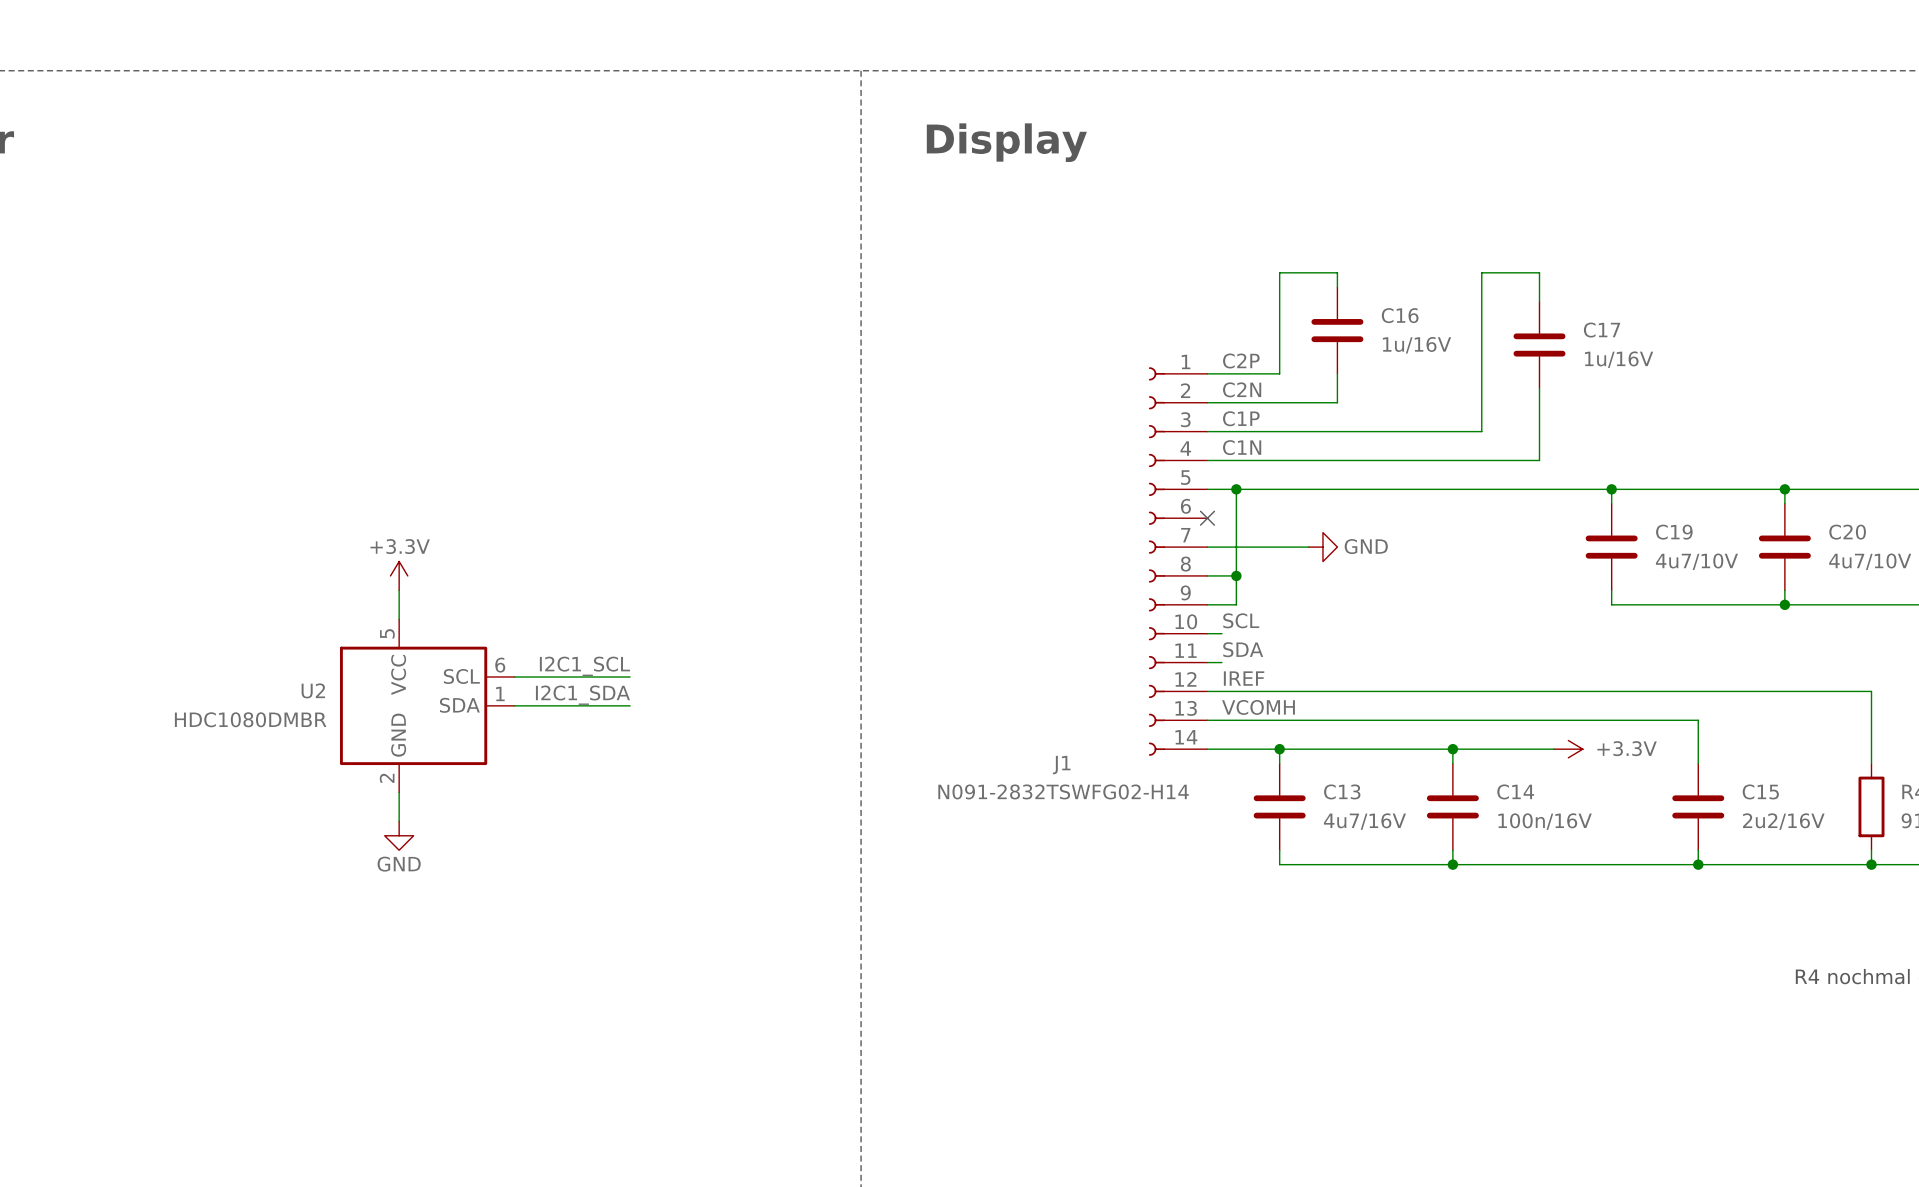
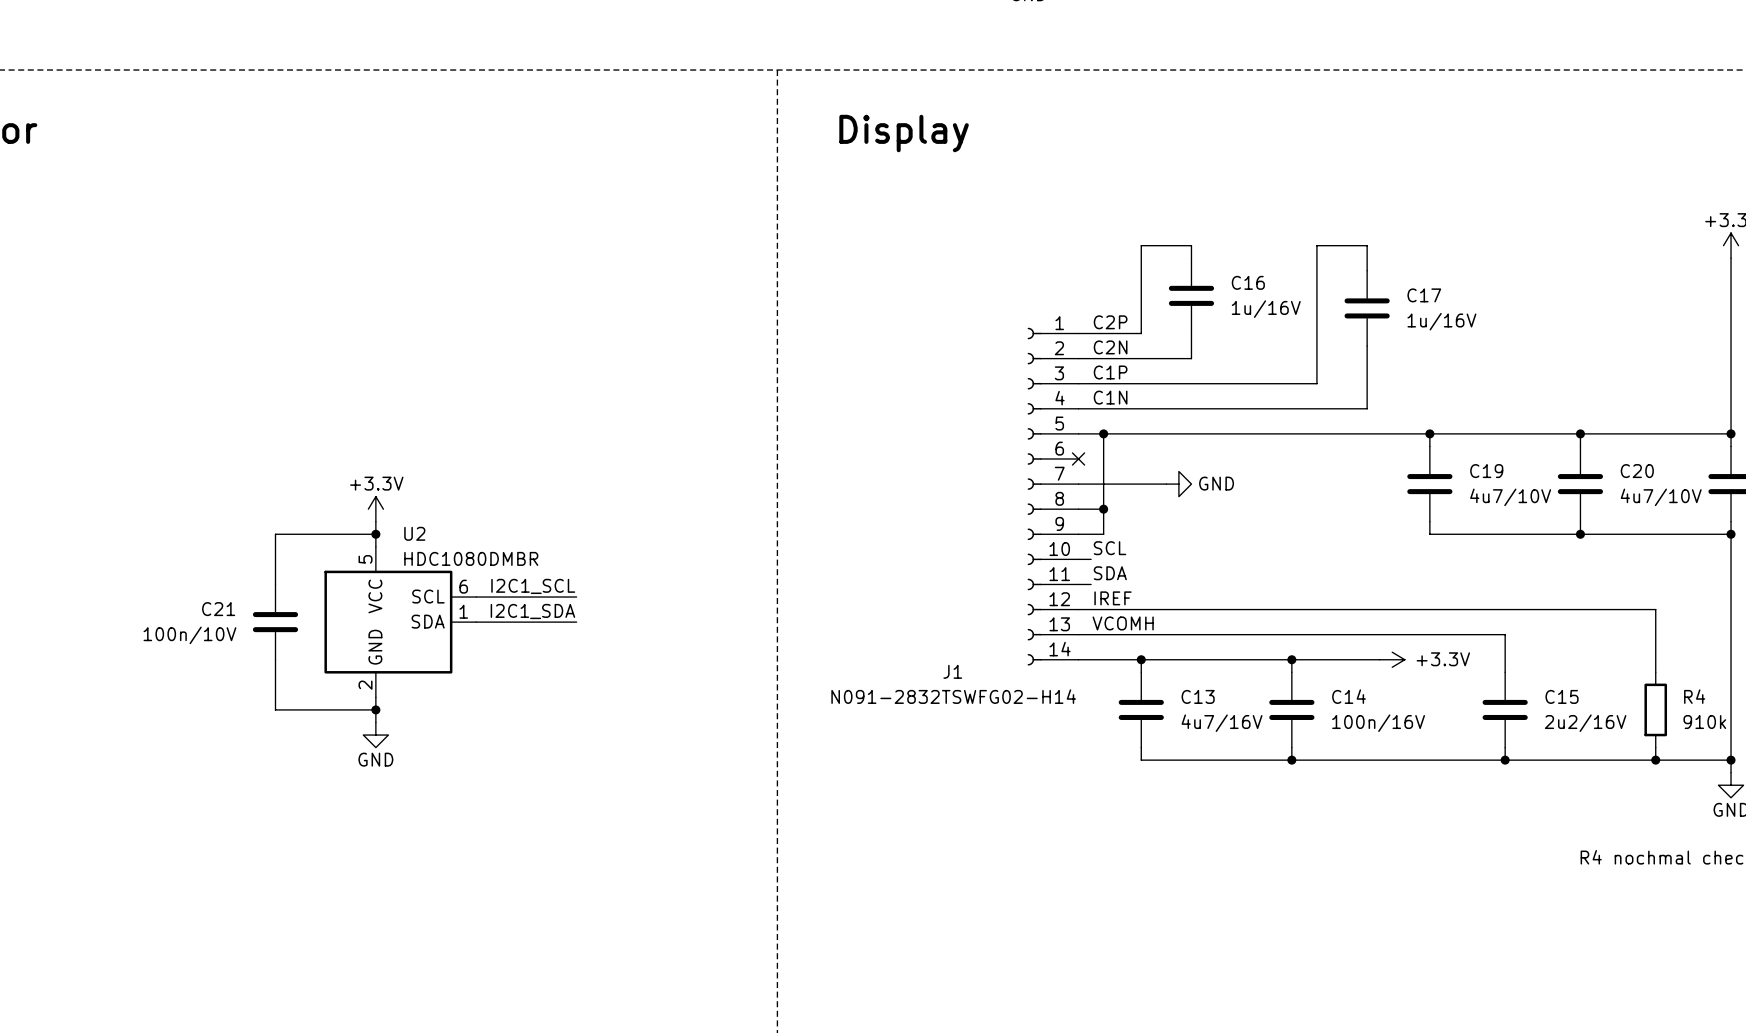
wire: none -> (375, 534) (275, 534) (275, 584)
junction: none -> (375, 534)
U2 name position: U2 (313, 690) -> U2 (414, 533)
C21: none -> 100n/10V (275, 622)
U2 value position: HDC1080DMBR (250, 719) -> HDC1080DMBR (471, 558)
wire: none -> (275, 659) (275, 709) (375, 709)
junction: none -> (375, 709)

